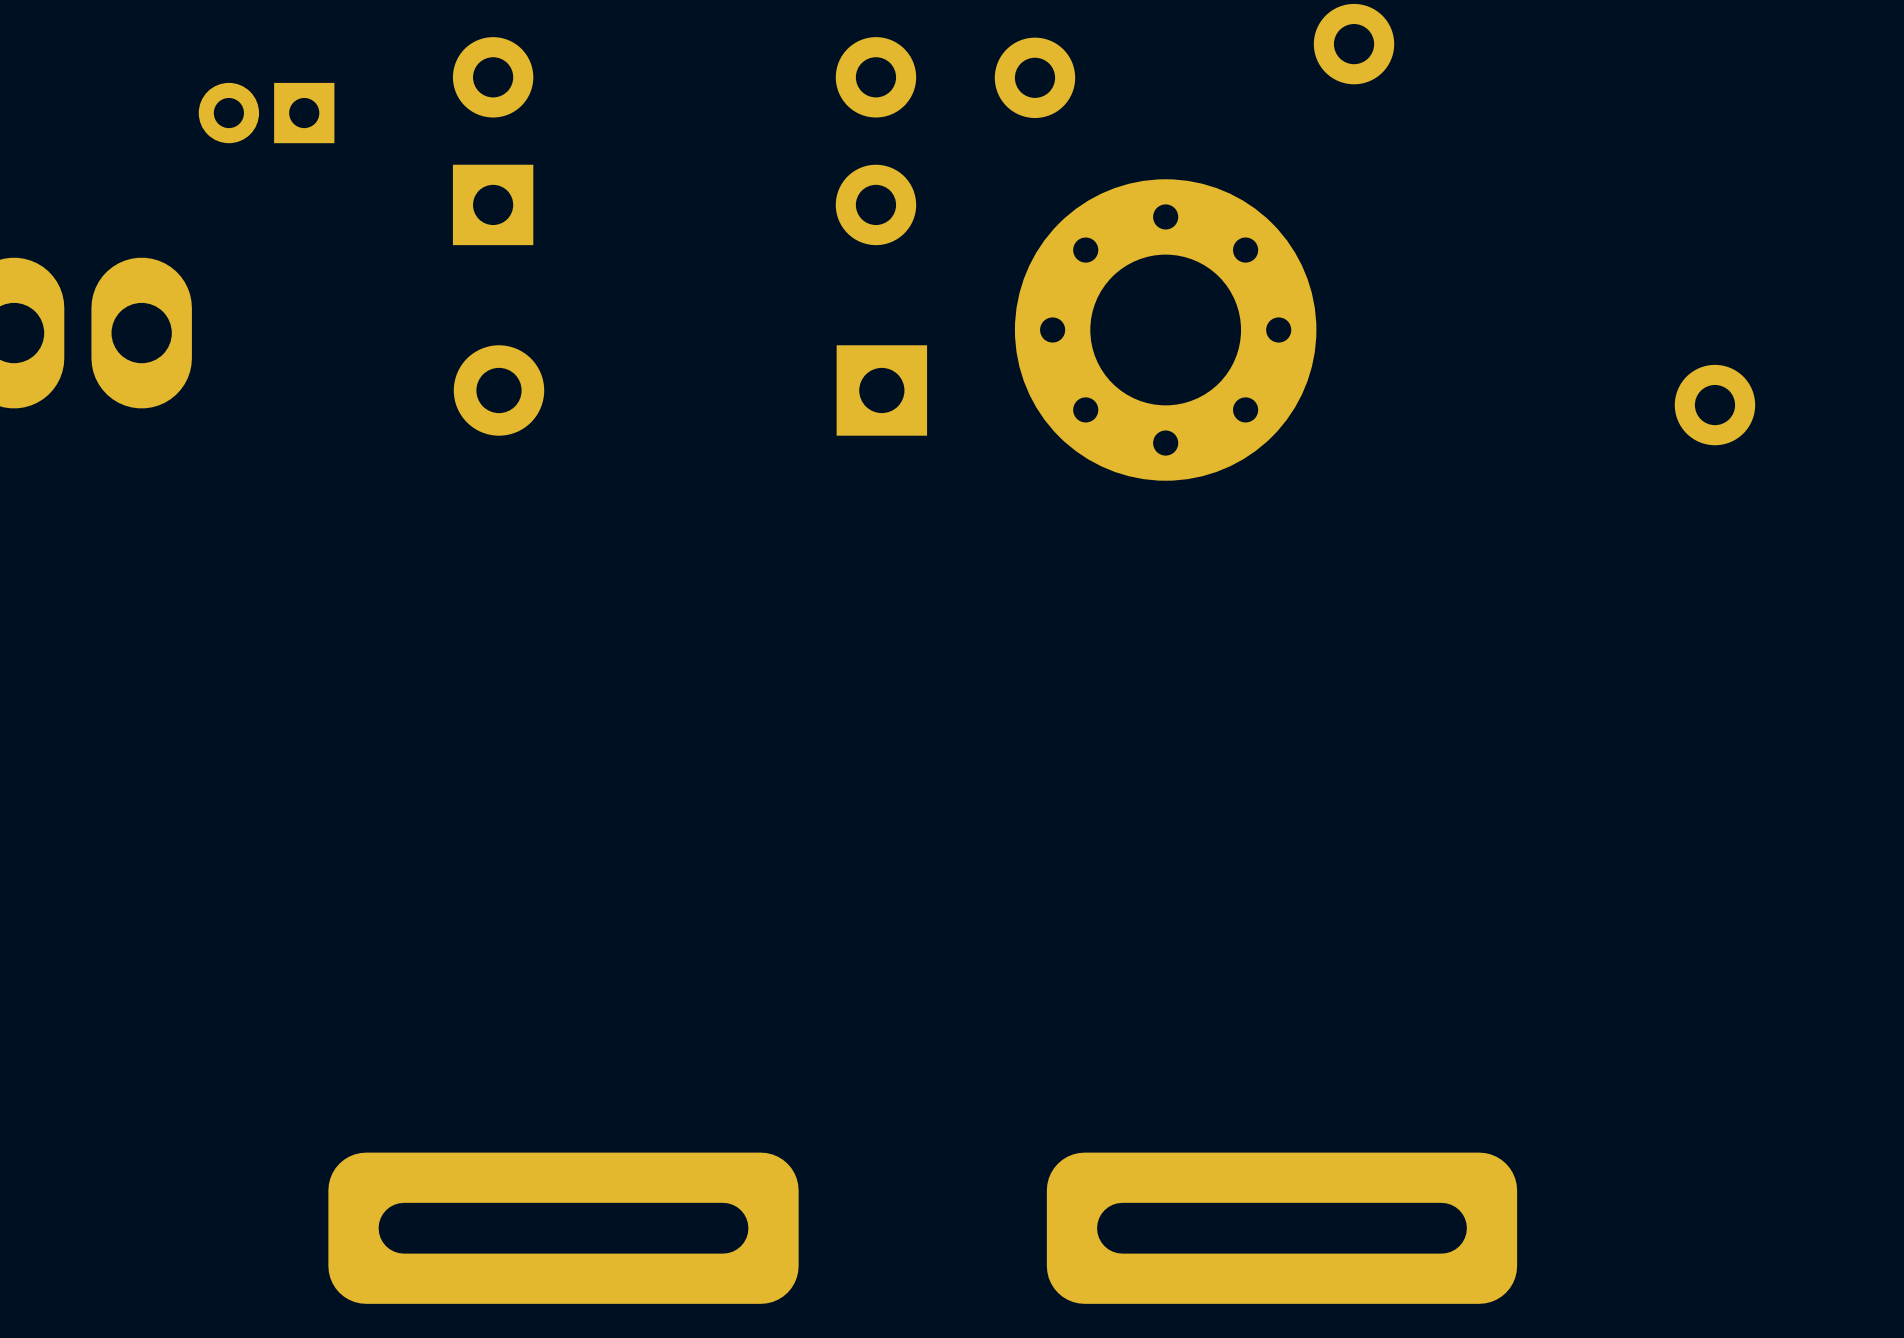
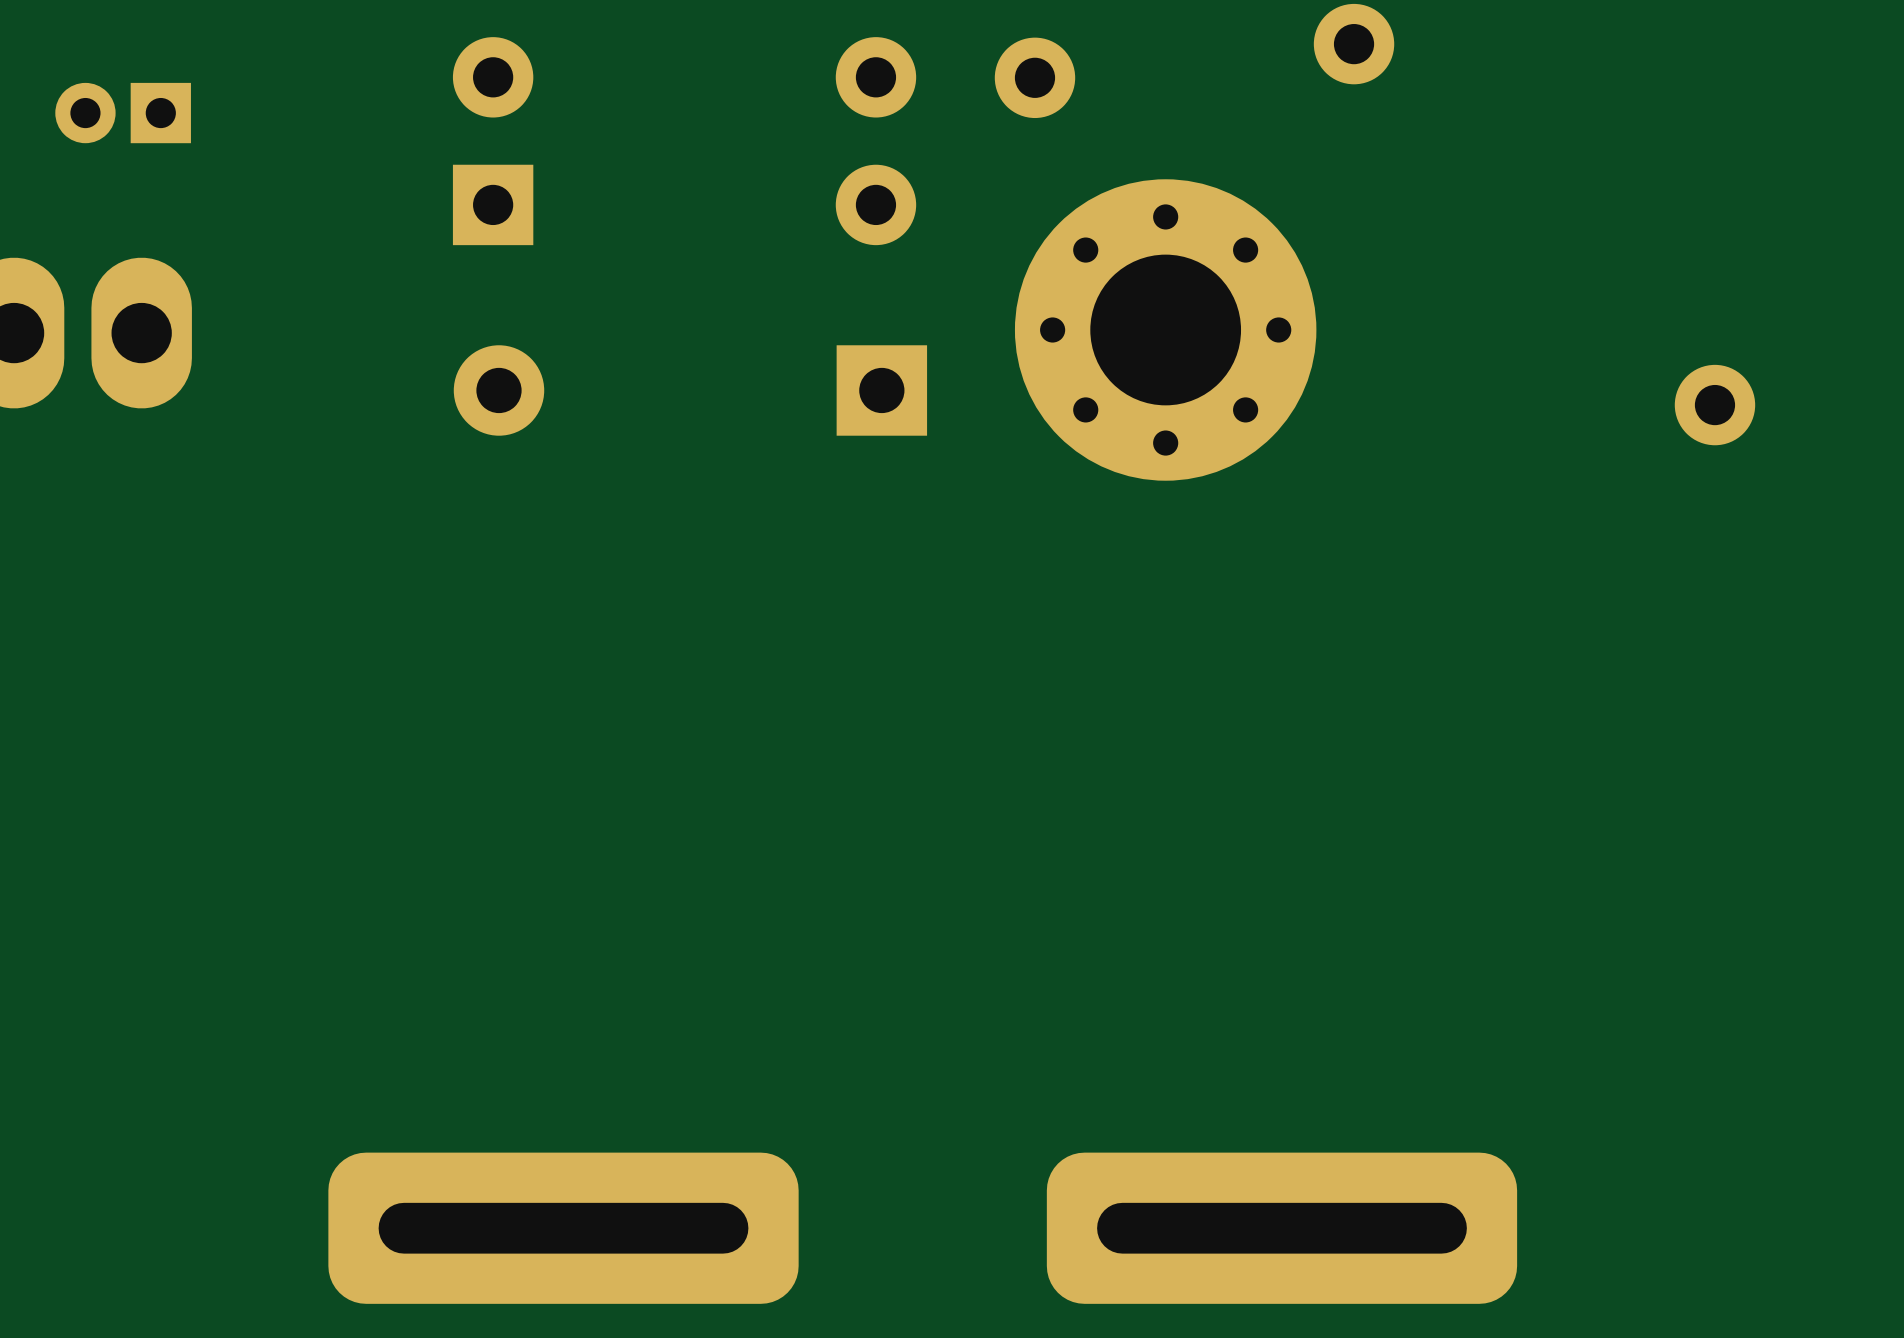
part position: (266, 113) -> (123, 113)

